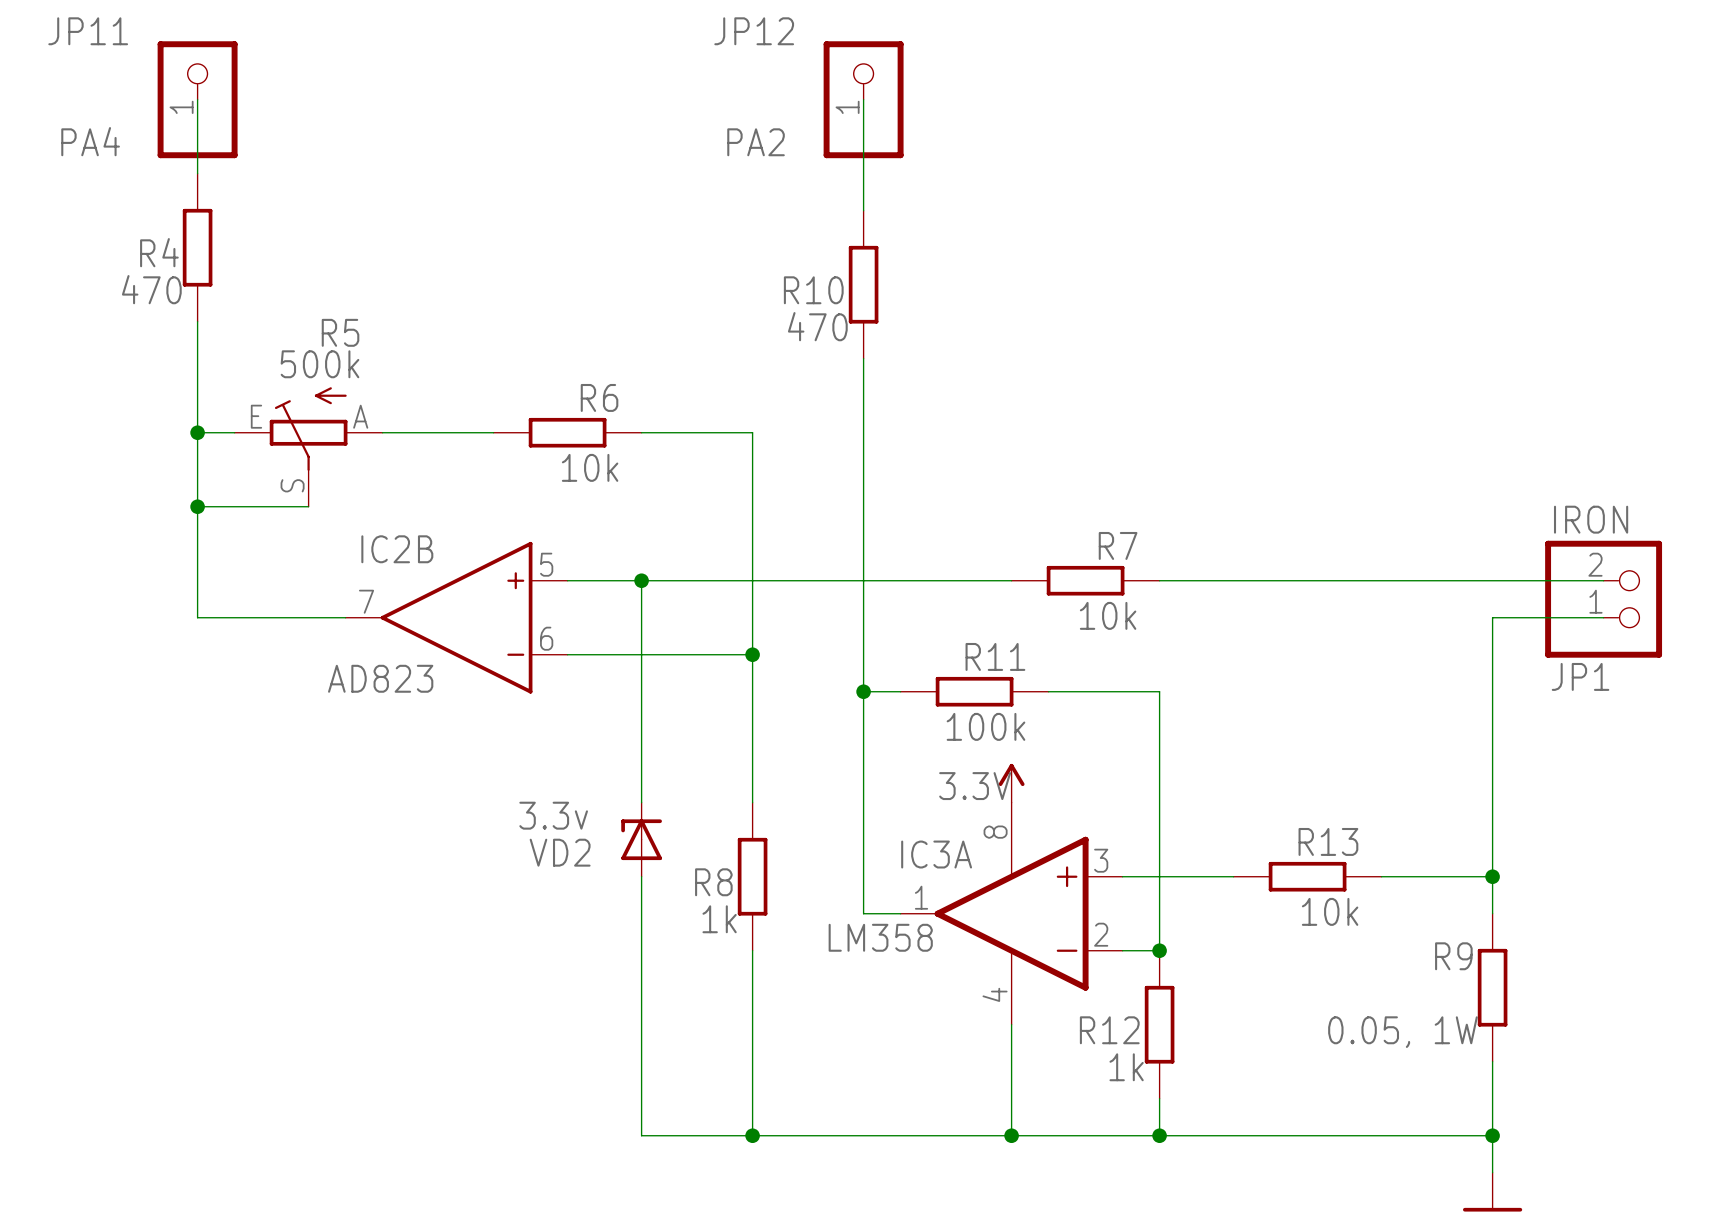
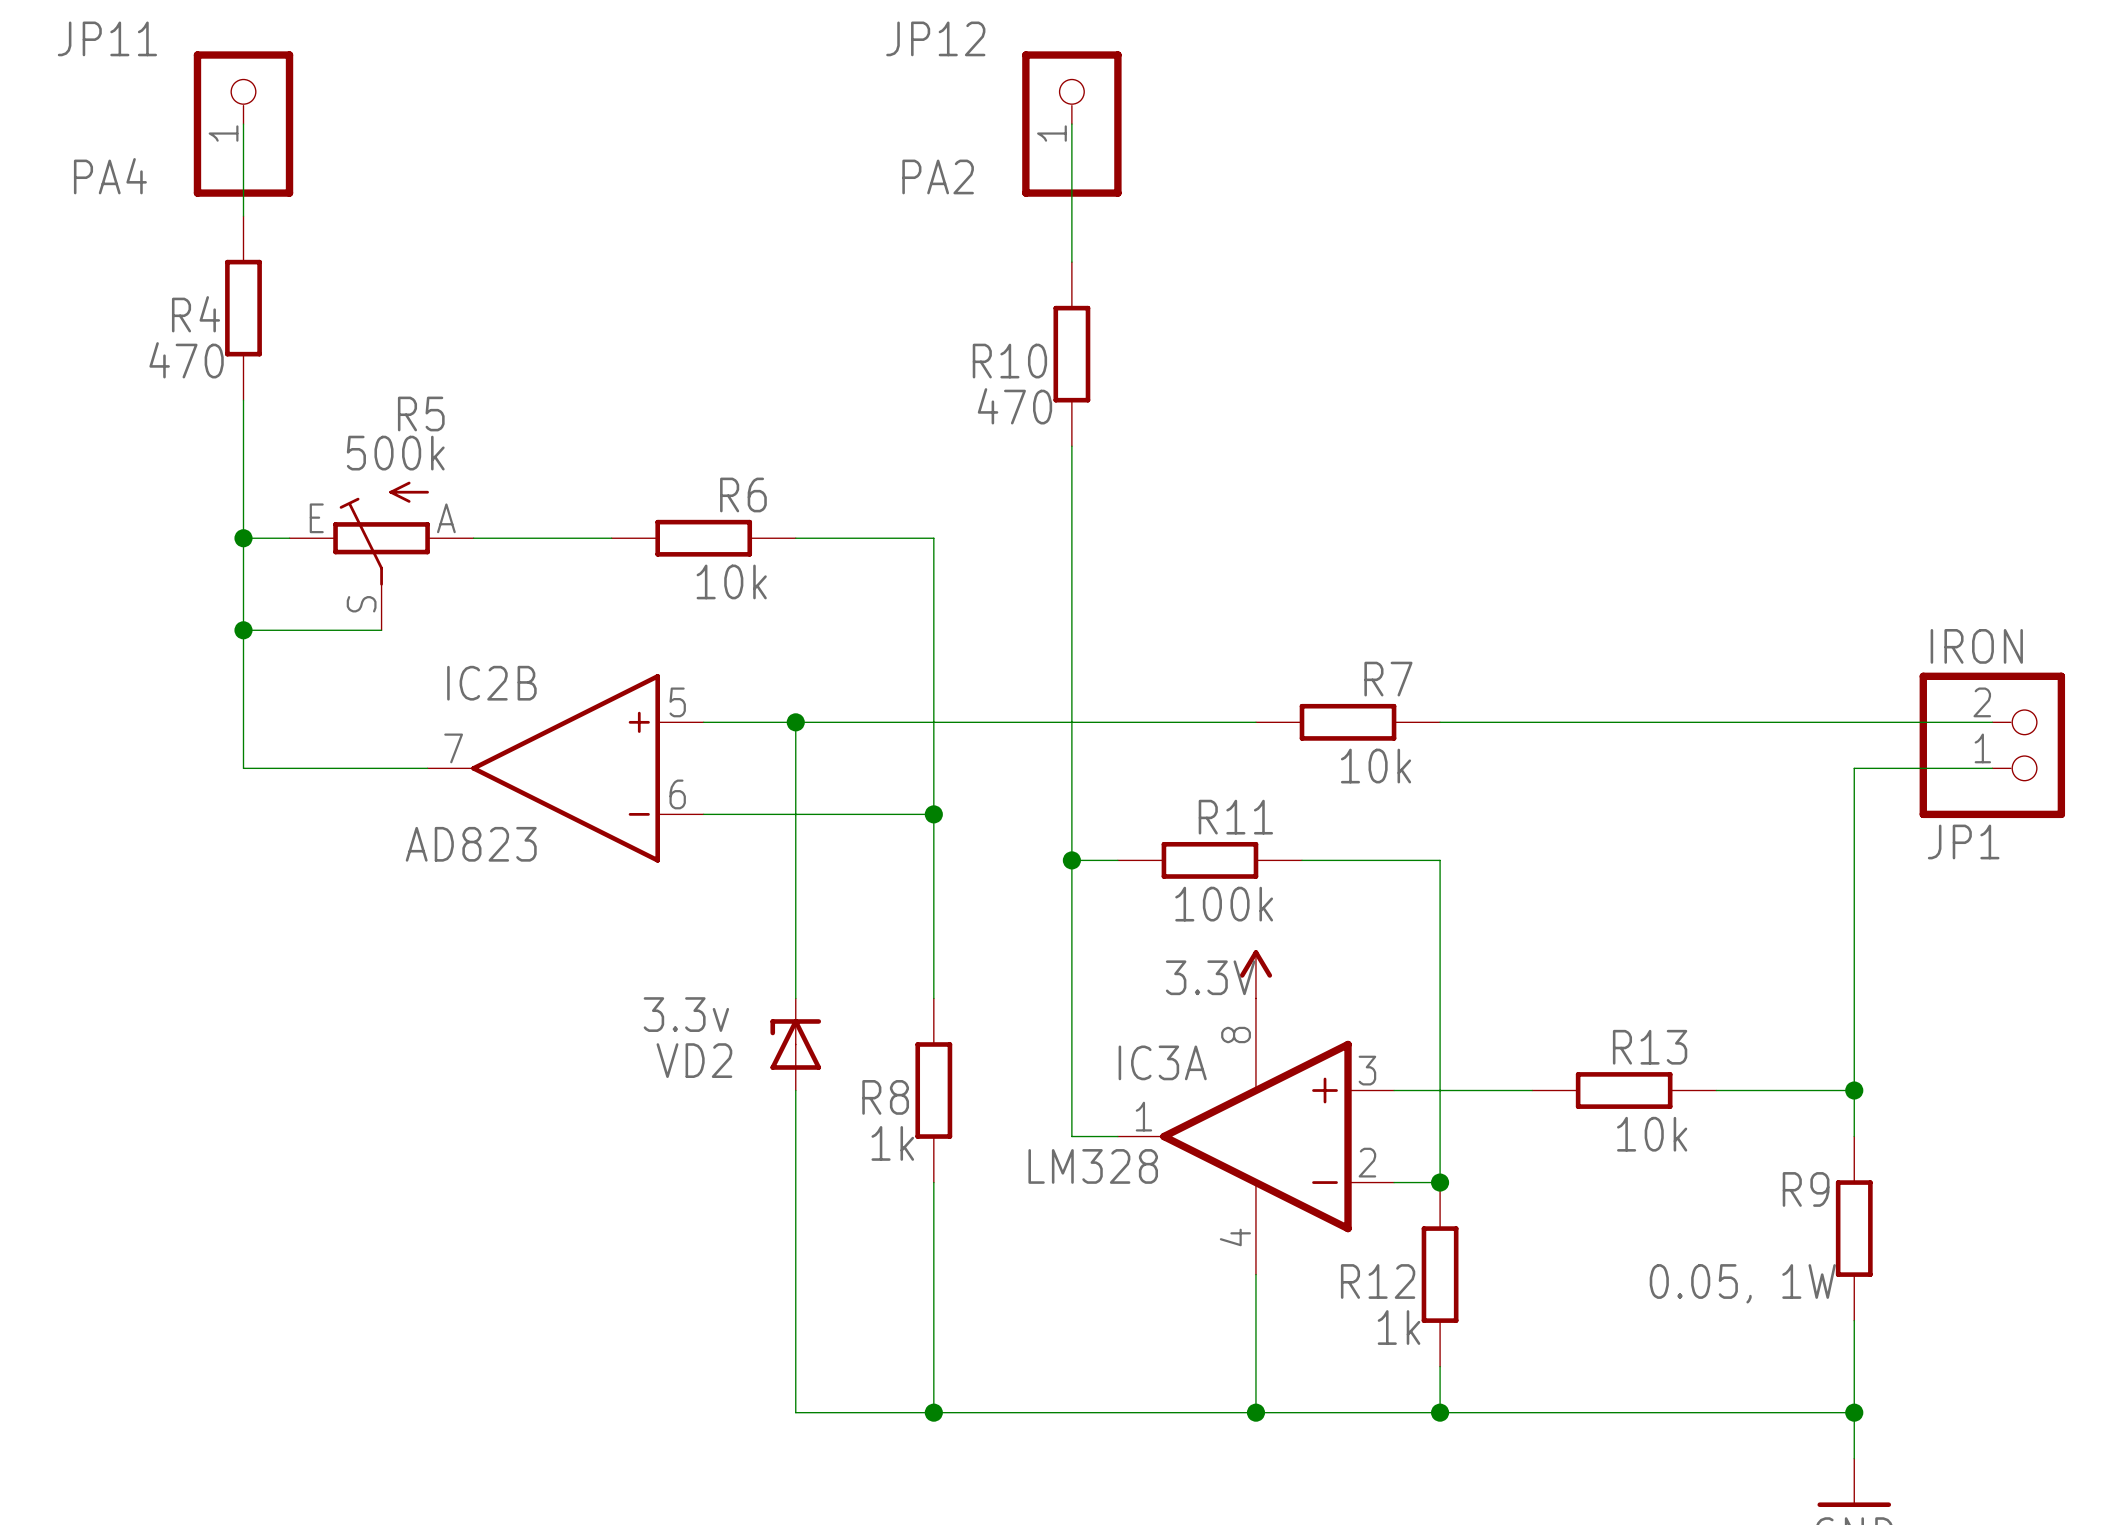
IC3A value: LM358 (880, 937) -> LM328 (1093, 1166)

